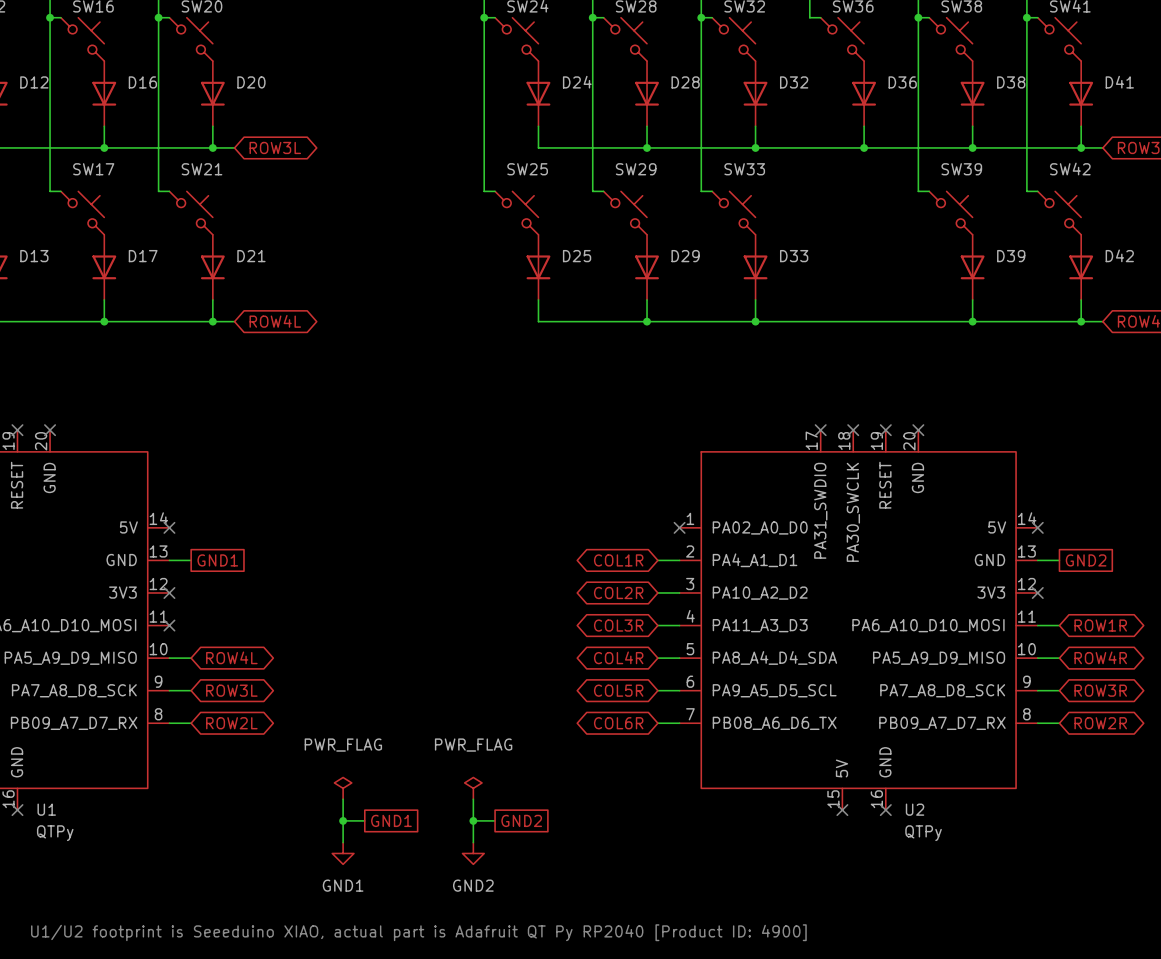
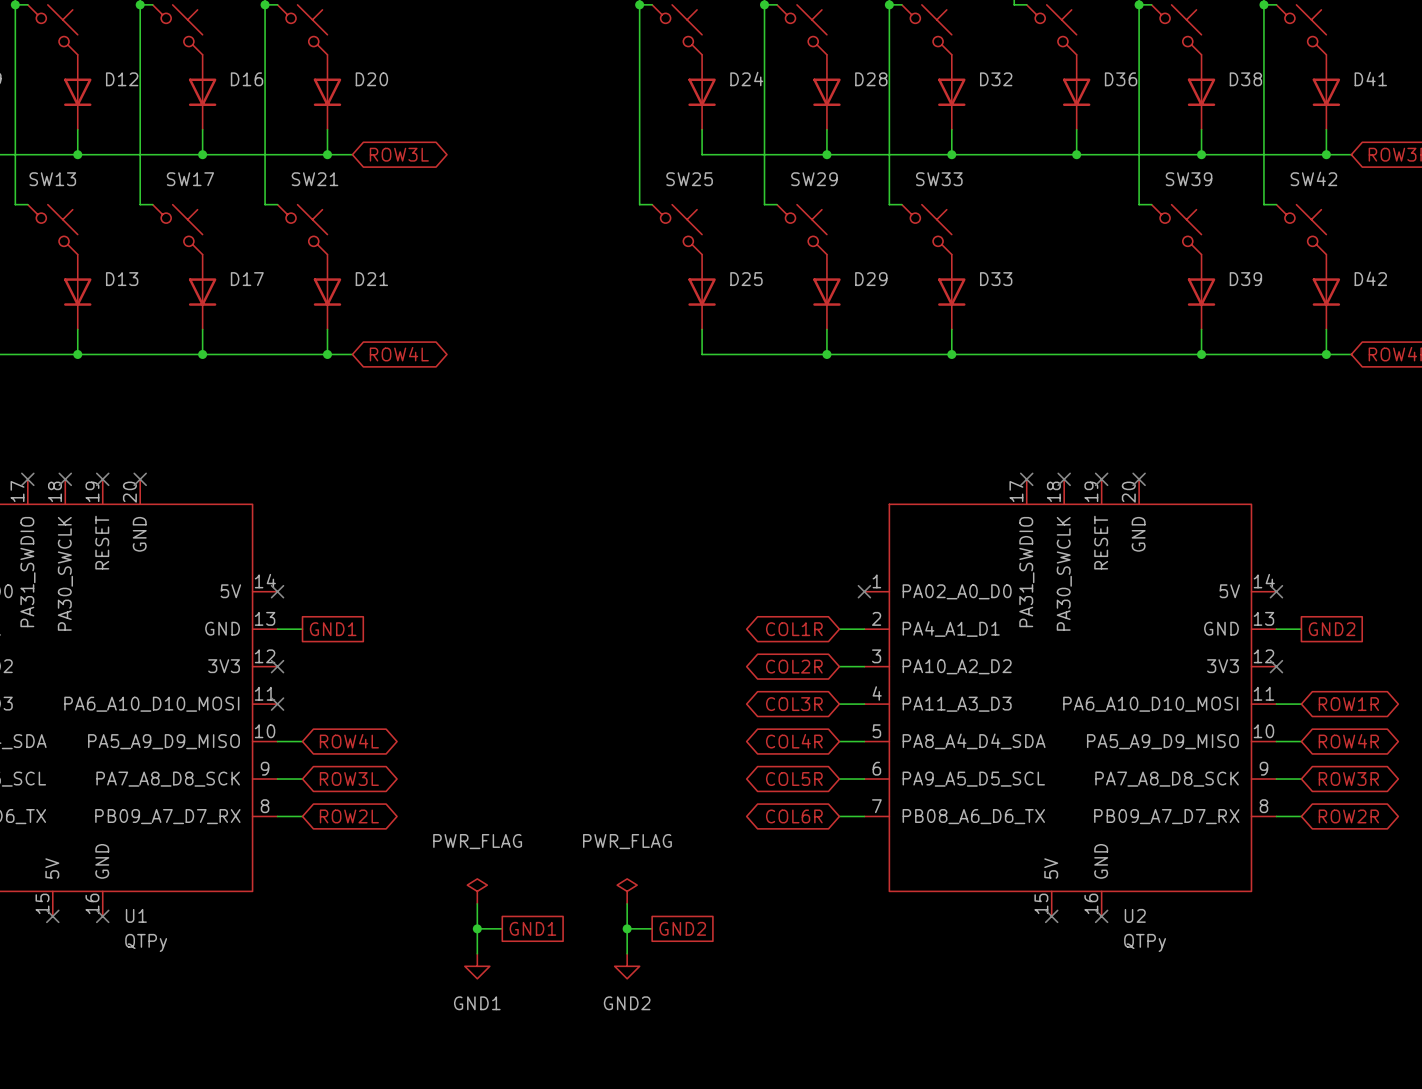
text: U1/U2 footprint is Seeeduino XIAO, actual part is Adafruit QT Py RP2040 [Product ID: 4900] (418, 932) -> none

